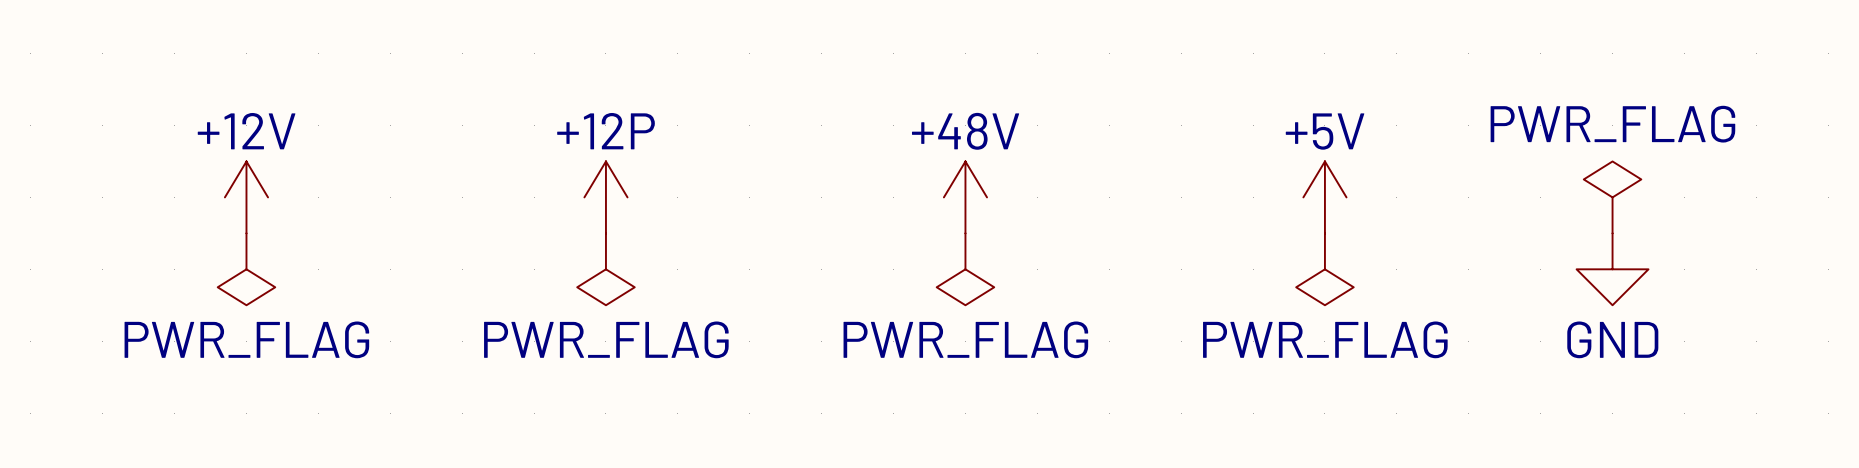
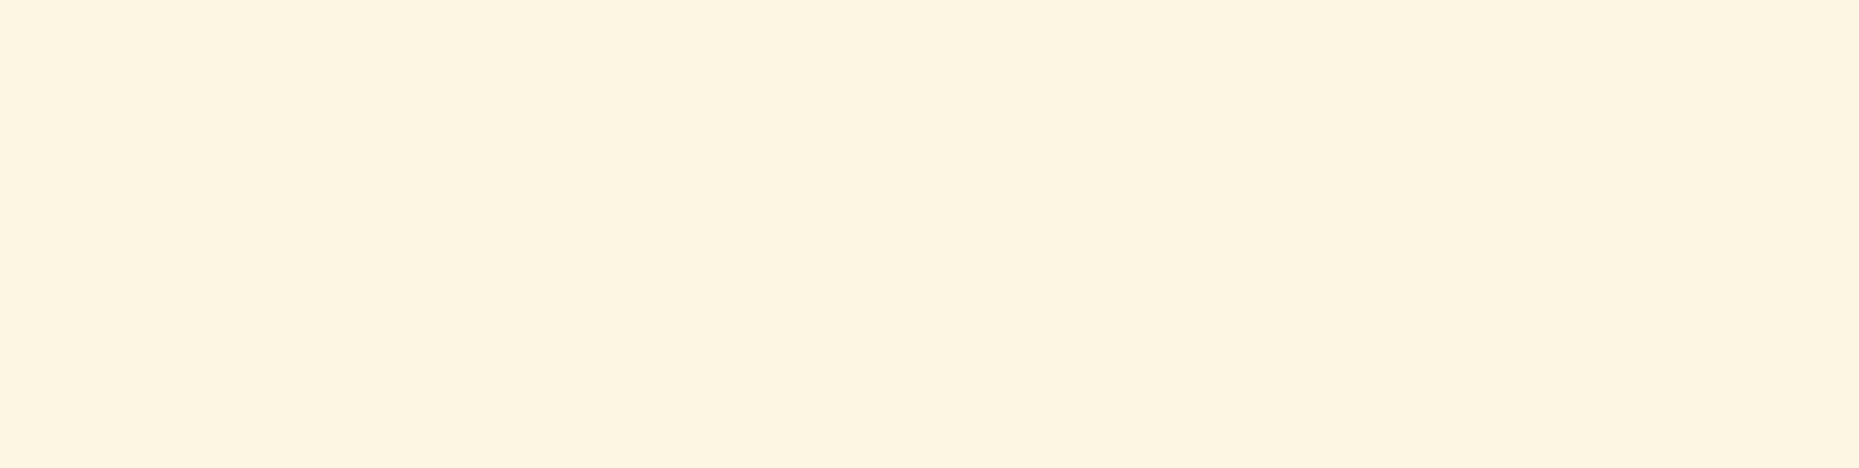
power symbol: +12V (246, 197) -> none
power symbol: +12P (605, 197) -> none
power symbol: +48V (965, 197) -> none
power symbol: +5V (1324, 197) -> none
power symbol: PWR_FLAG (1612, 197) -> none
power symbol: PWR_FLAG (246, 269) -> none
power symbol: PWR_FLAG (605, 269) -> none
power symbol: PWR_FLAG (965, 269) -> none
power symbol: PWR_FLAG (1324, 269) -> none
power symbol: GND (1612, 269) -> none

